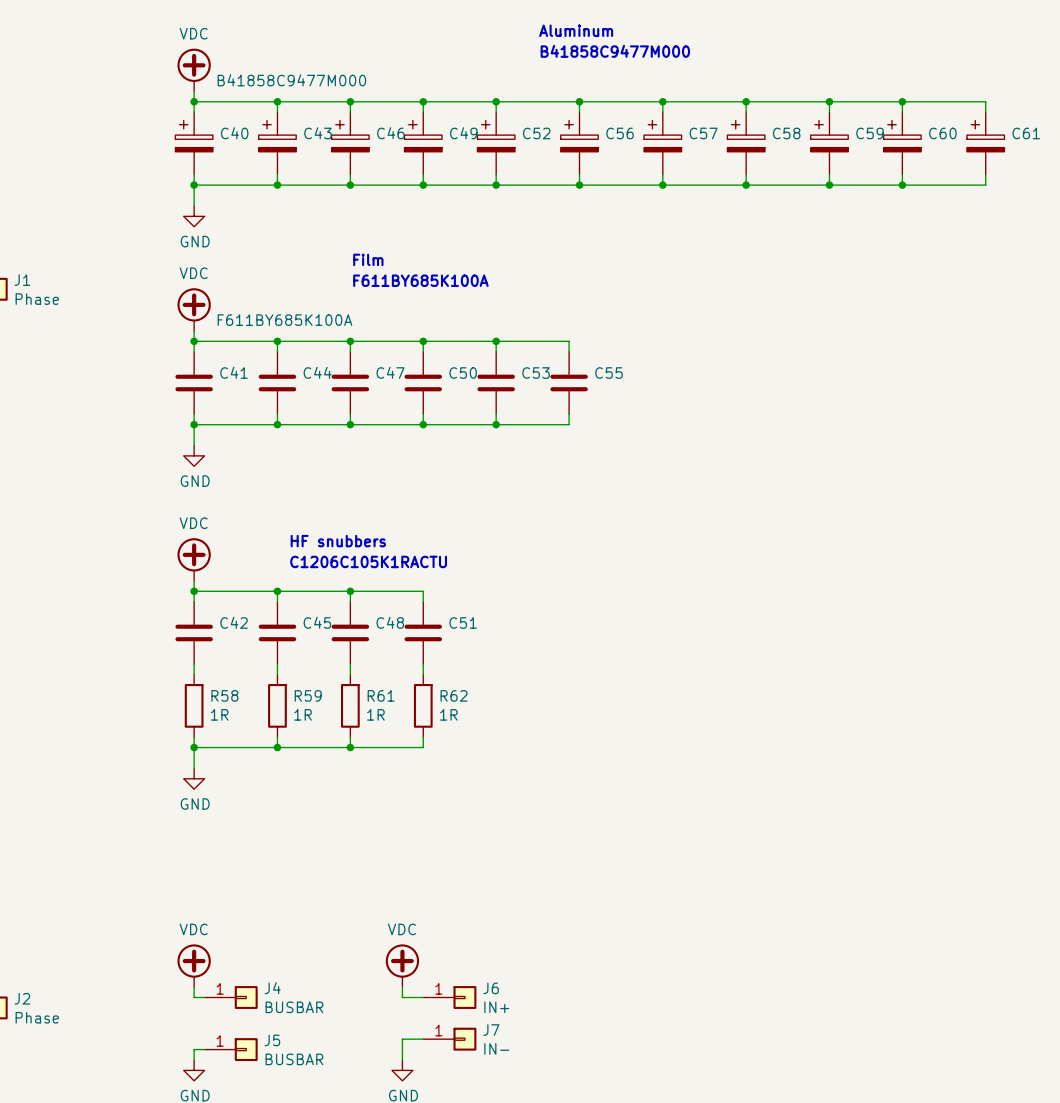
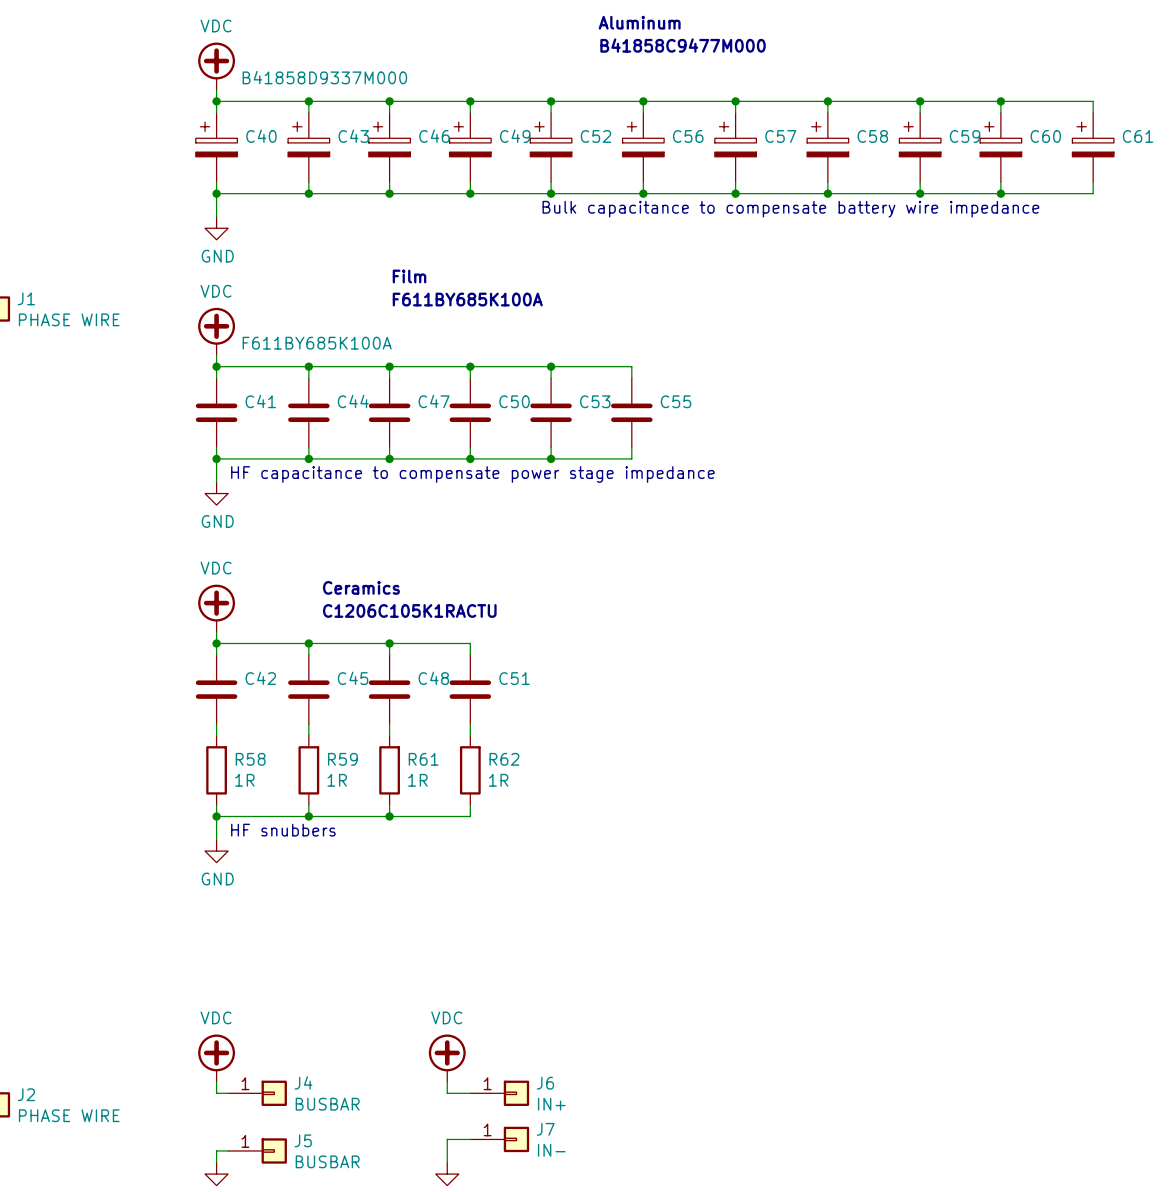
C40 value: B41858C9477M000 (291, 80) -> B41858D9337M000 (324, 77)
text: none -> Bulk capacitance to compensate battery wire impedance (790, 209)
J1 value: Phase (37, 299) -> PHASE WIRE (69, 319)
text: none -> HF capacitance to compensate power stage impedance (472, 474)
text: HF snubbers (338, 541) -> Ceramics (361, 587)
text: none -> HF snubbers (283, 830)
J2 value: Phase (37, 1017) -> PHASE WIRE (69, 1115)

